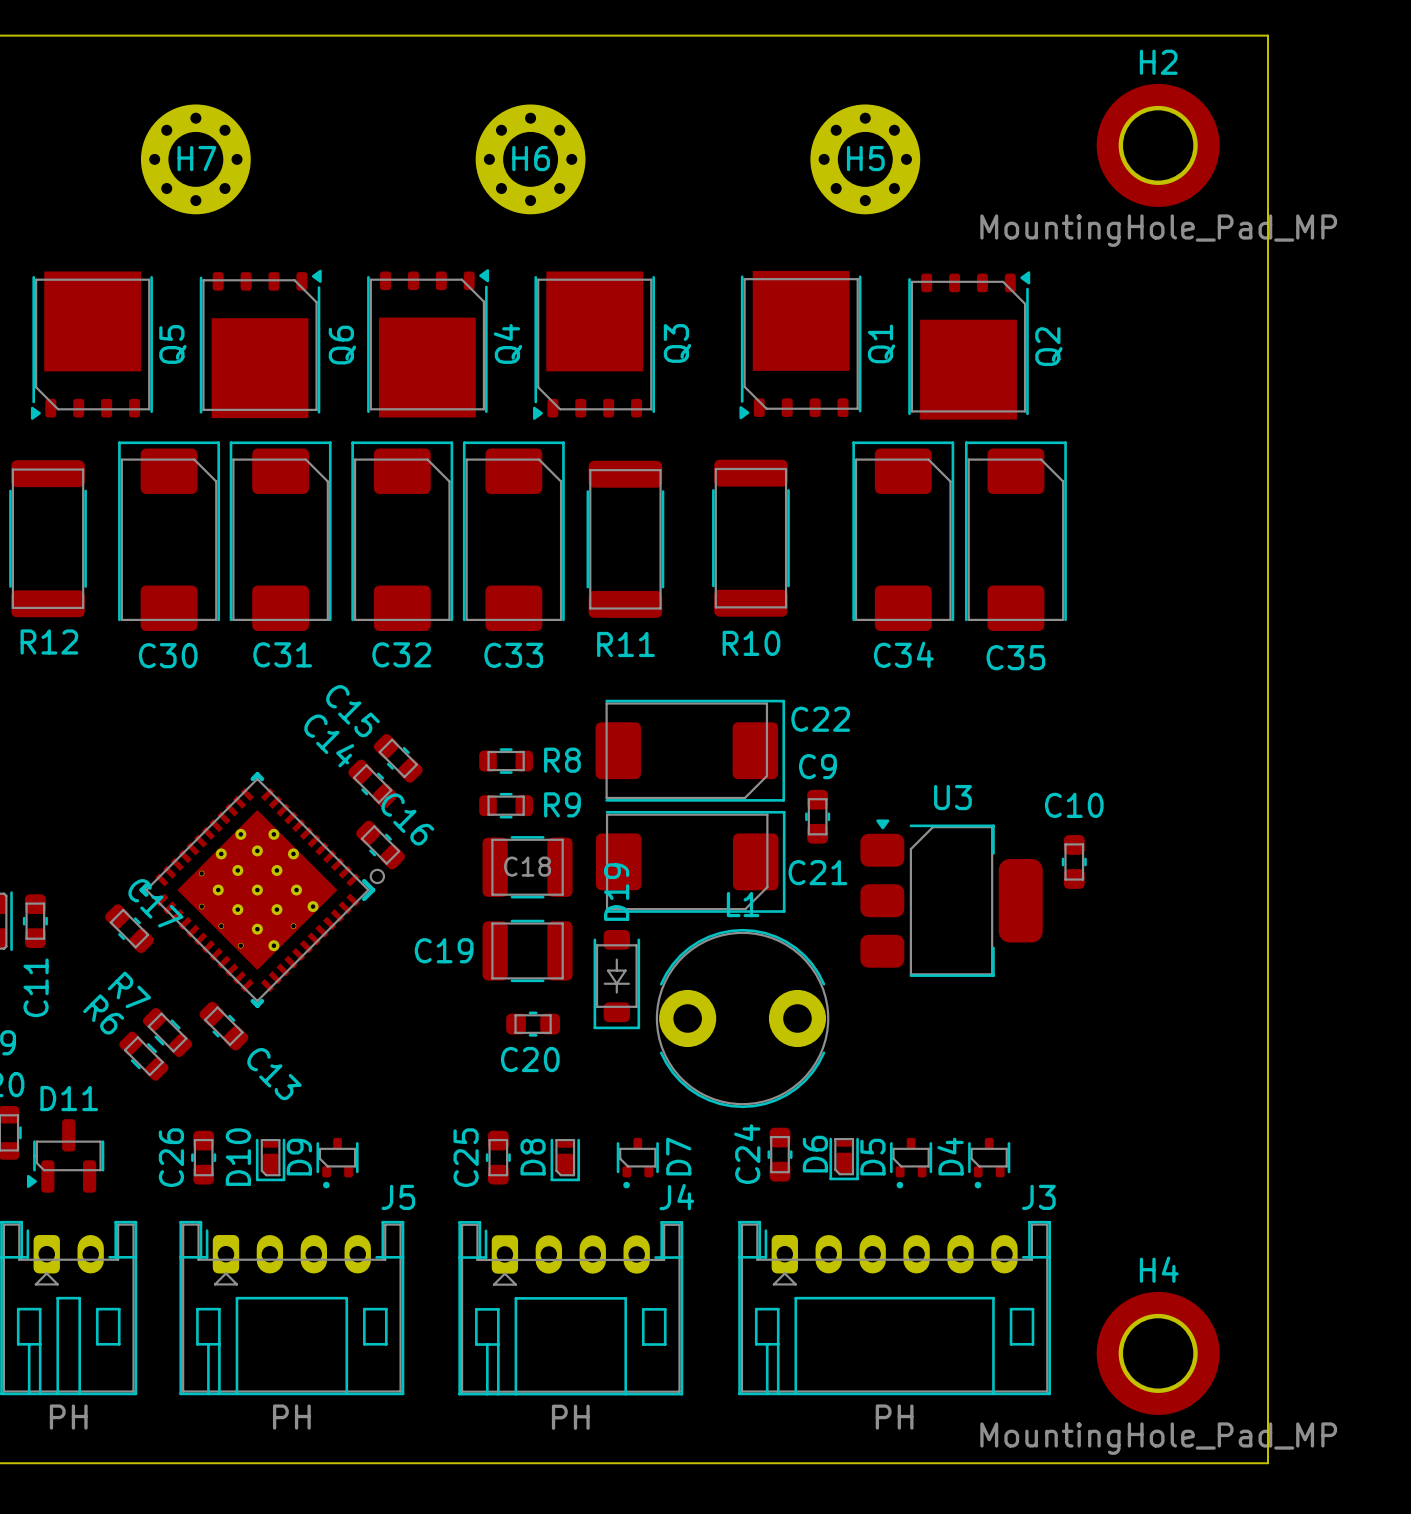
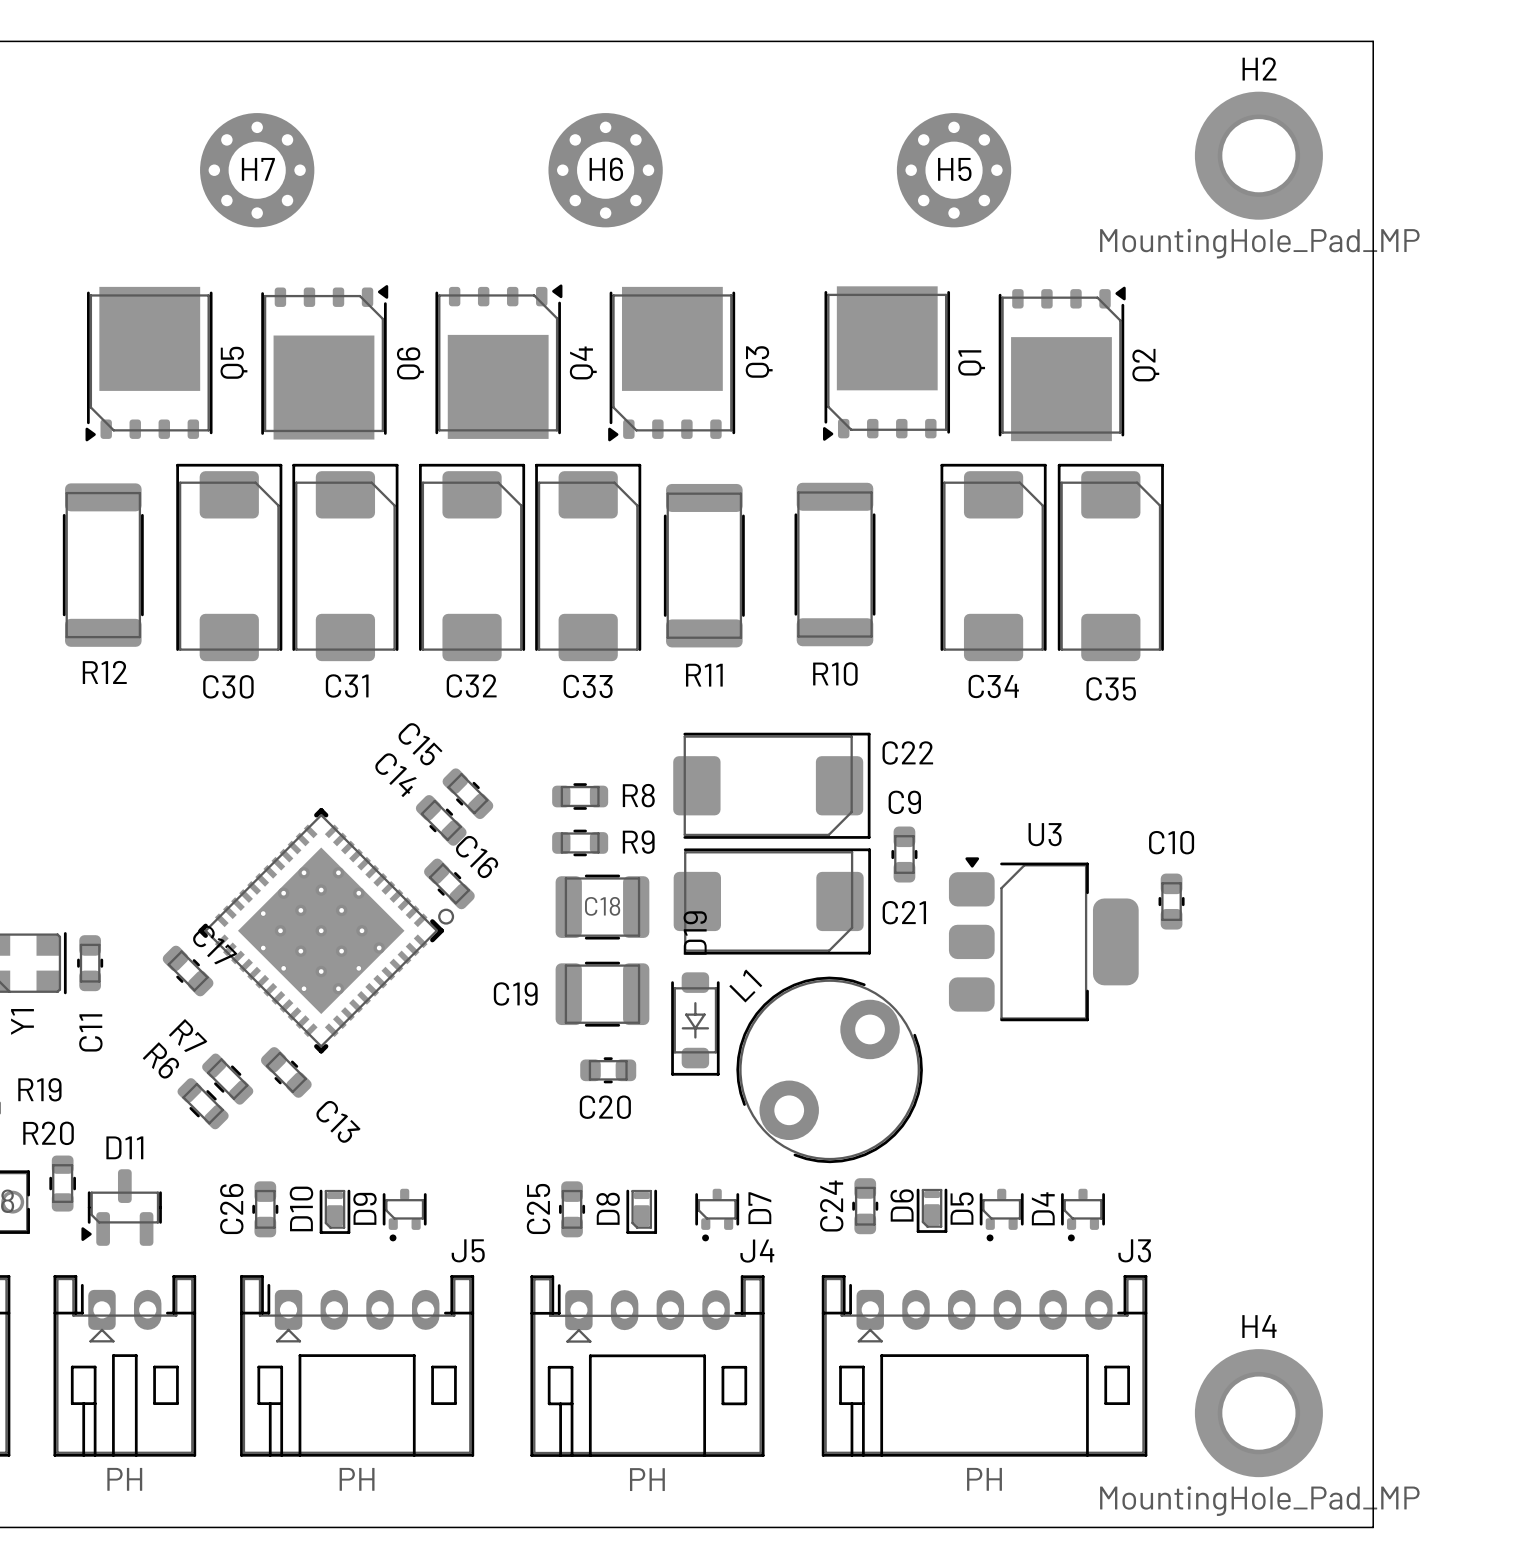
L1 rotation: 0° (742, 1018) -> 45° counterclockwise (829, 1069)

